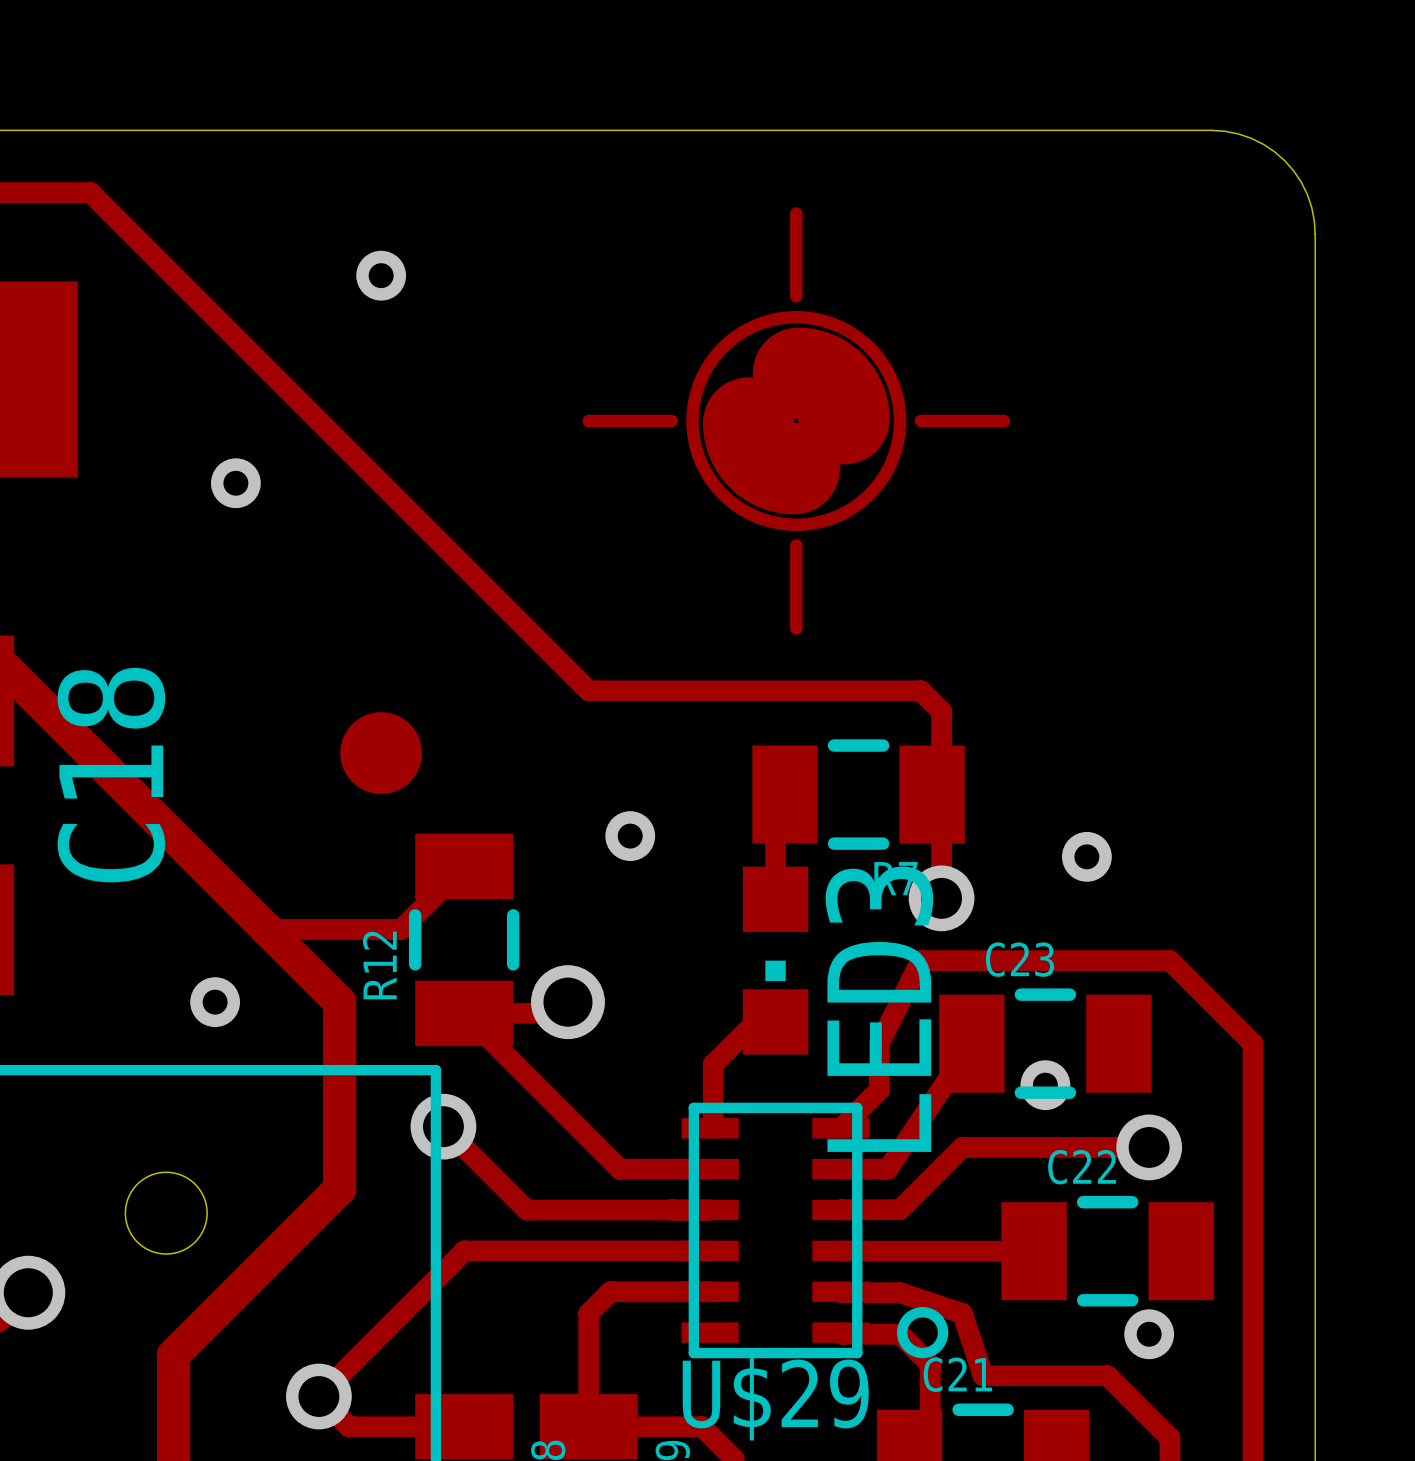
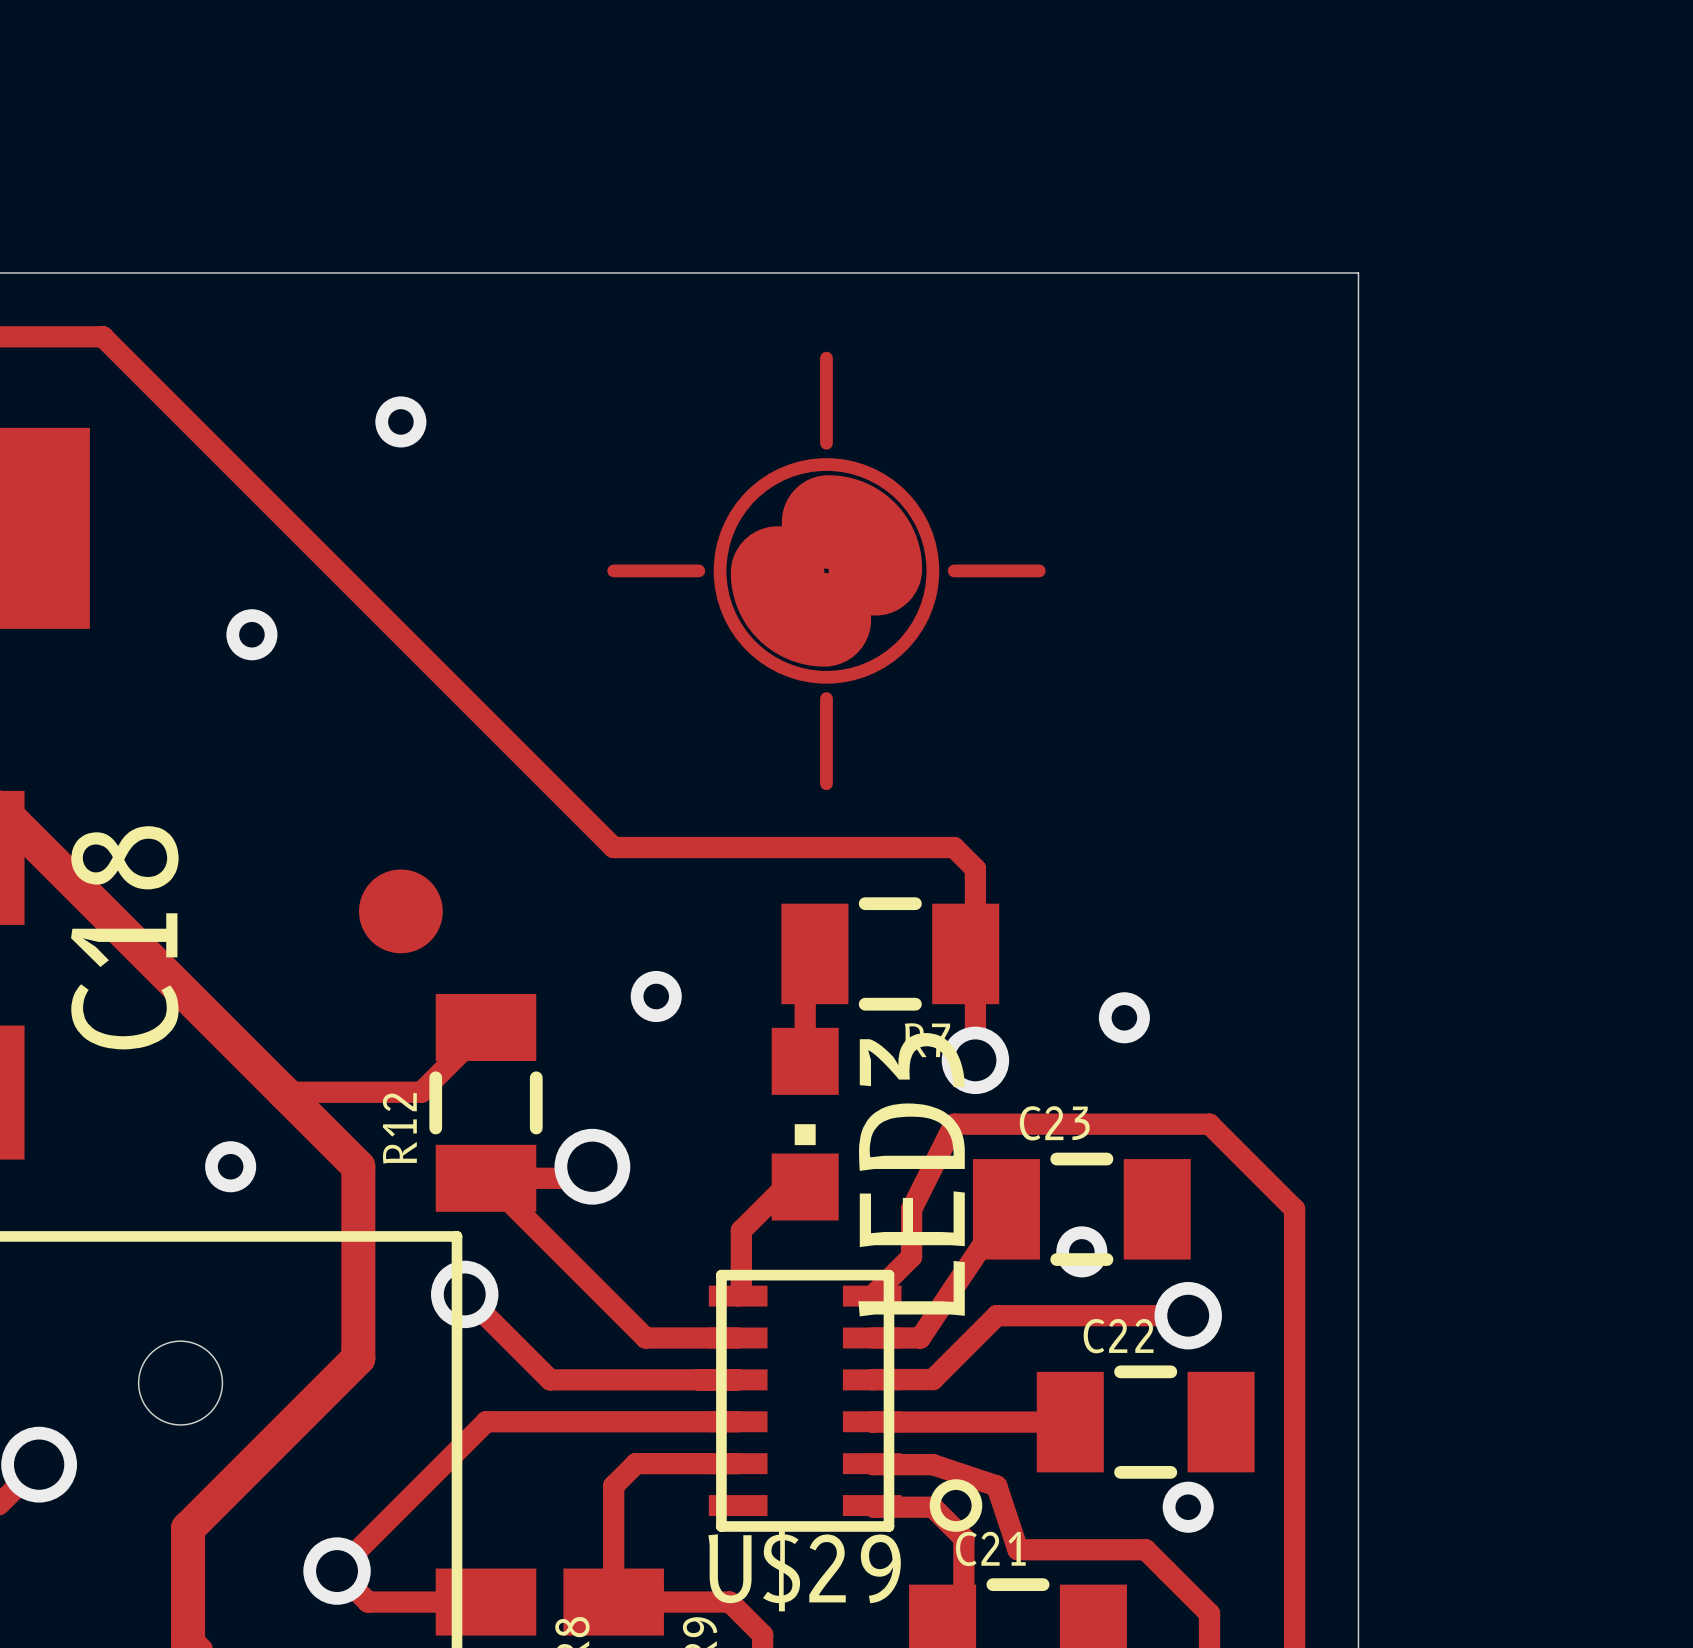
board edge: (1211, 130) (1238, 133) (1251, 138) (1263, 144) (1284, 160) (1301, 182) (1307, 194) (1311, 207) (1315, 234) -> (1252, 272) (1358, 272) (1358, 379)

